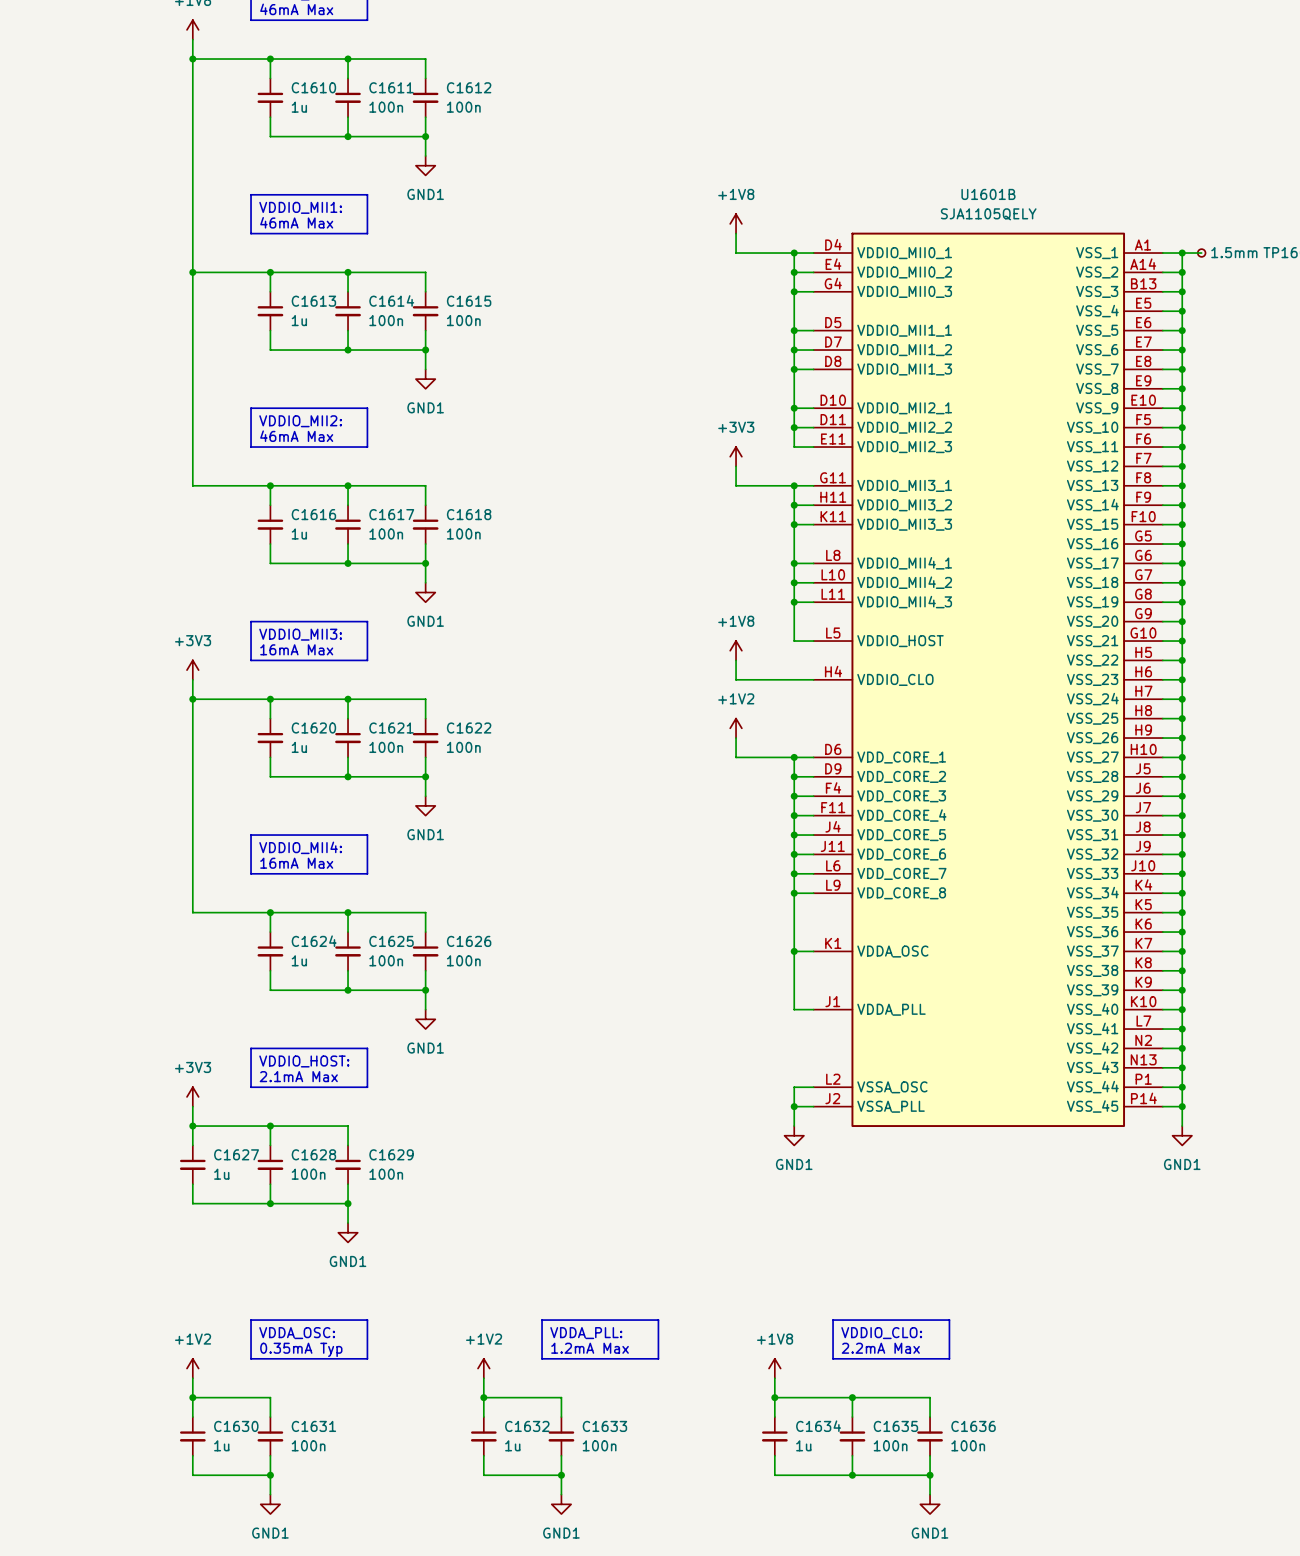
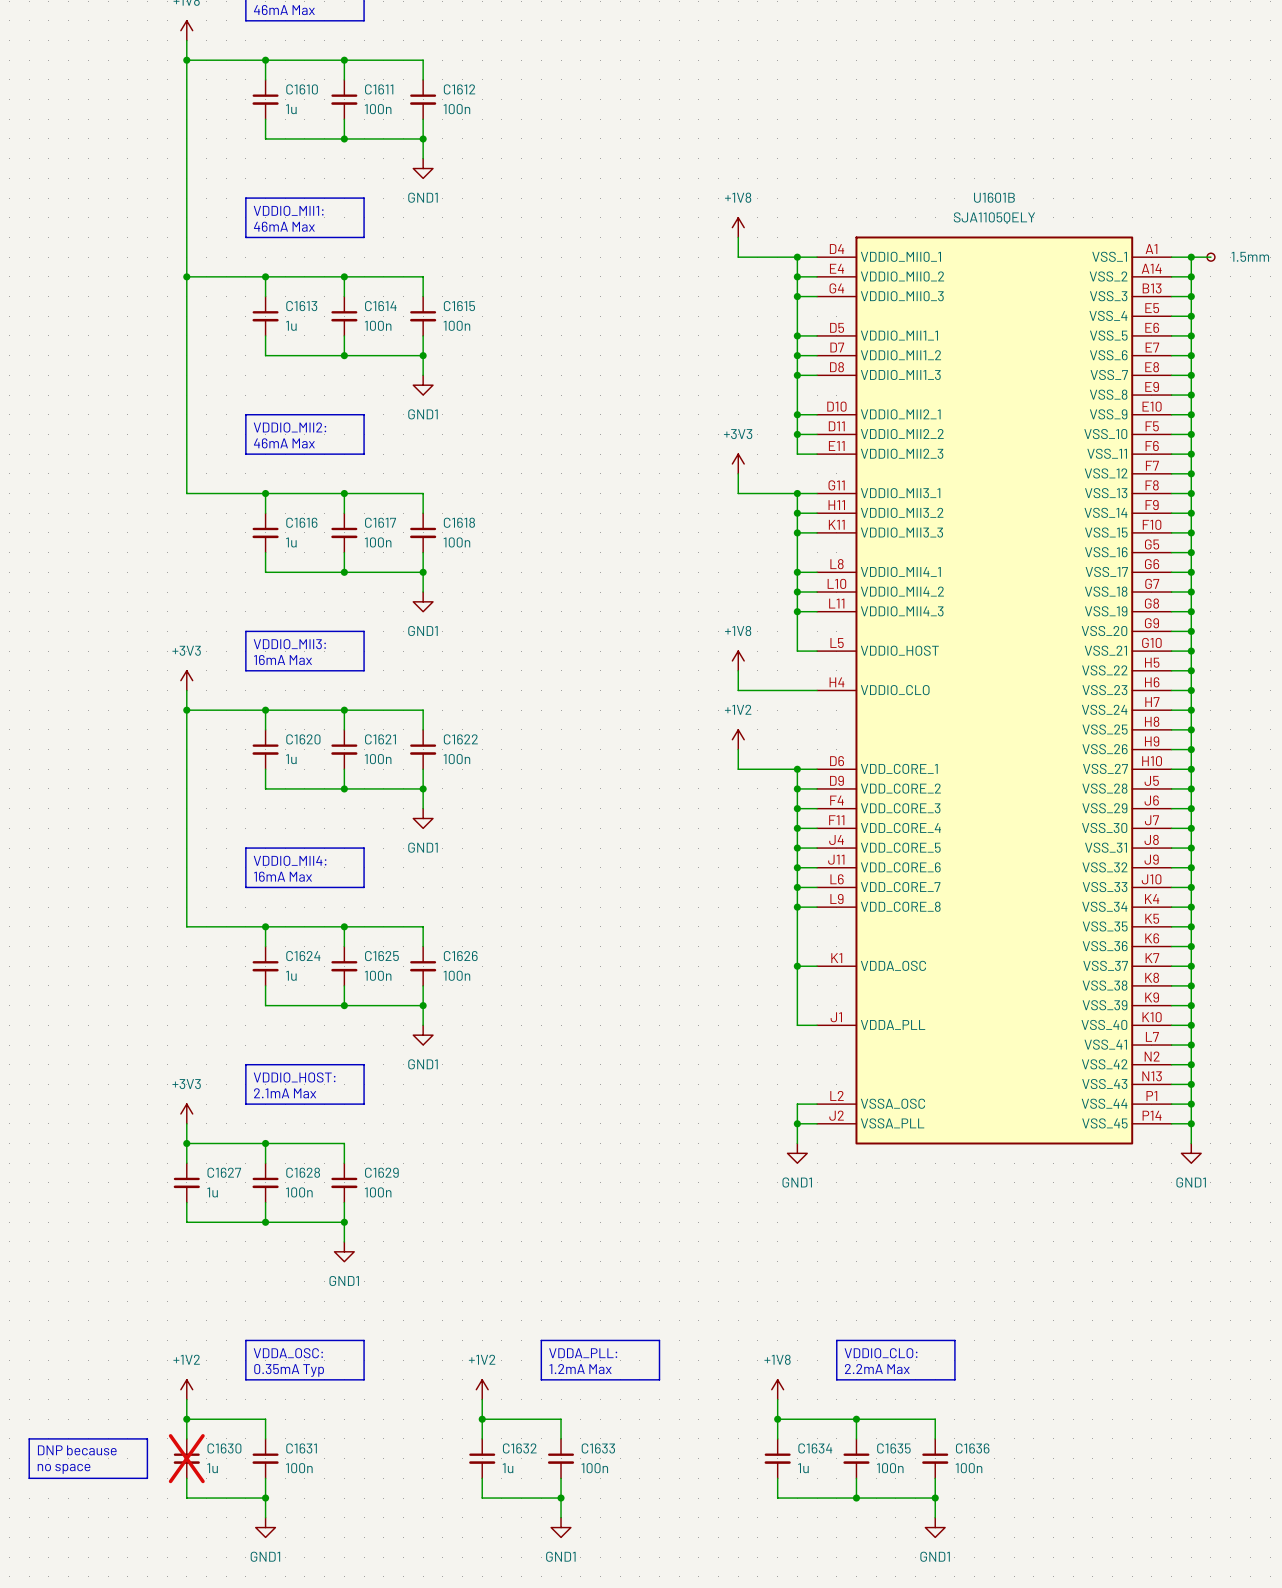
line: none -> (29, 1438) (147, 1438) (147, 1478) (29, 1478) (29, 1438)
text: none -> DNP because (77, 1450)
C1630 do-not-place cross: none -> (186, 1458)
text: none -> no space (64, 1468)

